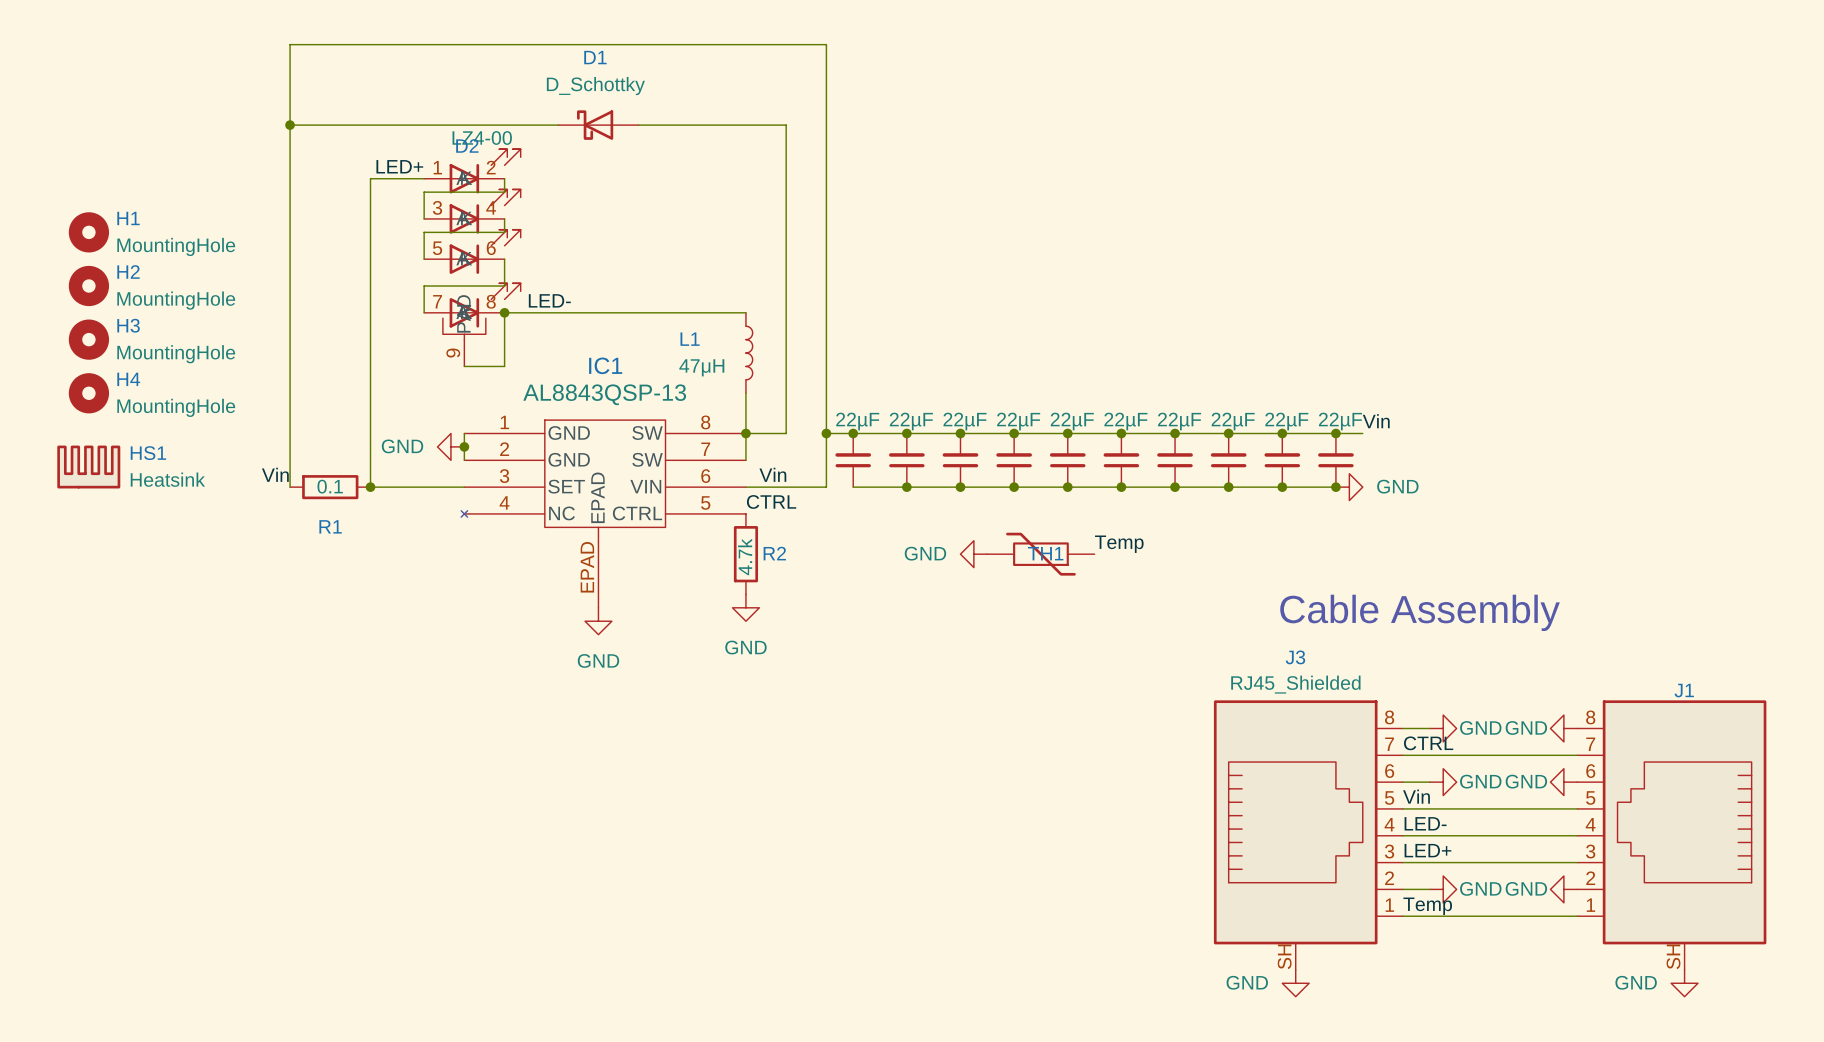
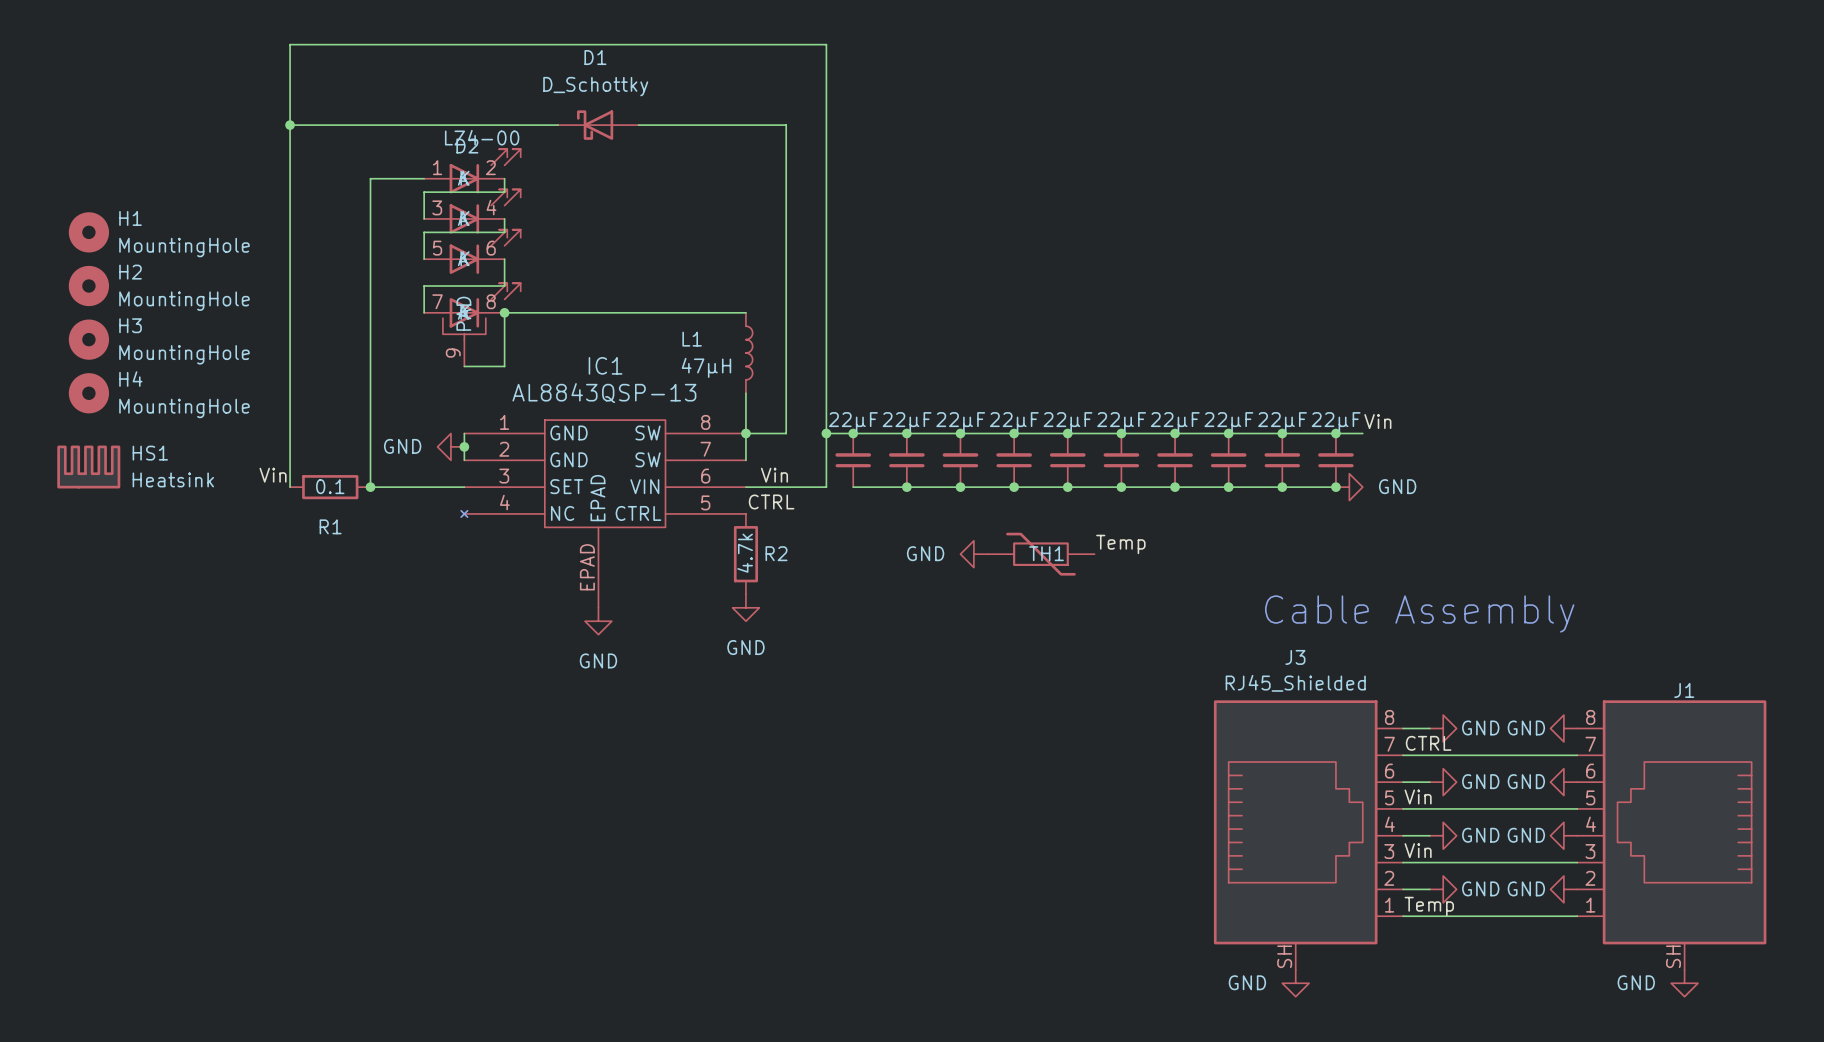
label: LED+ (399, 166) -> none
label: LED- (549, 300) -> none
label: LED- (1425, 823) -> none
wire: (1429, 835) (1577, 835) -> none
power symbol: none -> GND (1443, 835)
power symbol: none -> GND (1563, 835)
label: LED+ (1427, 850) -> Vin (1418, 850)

